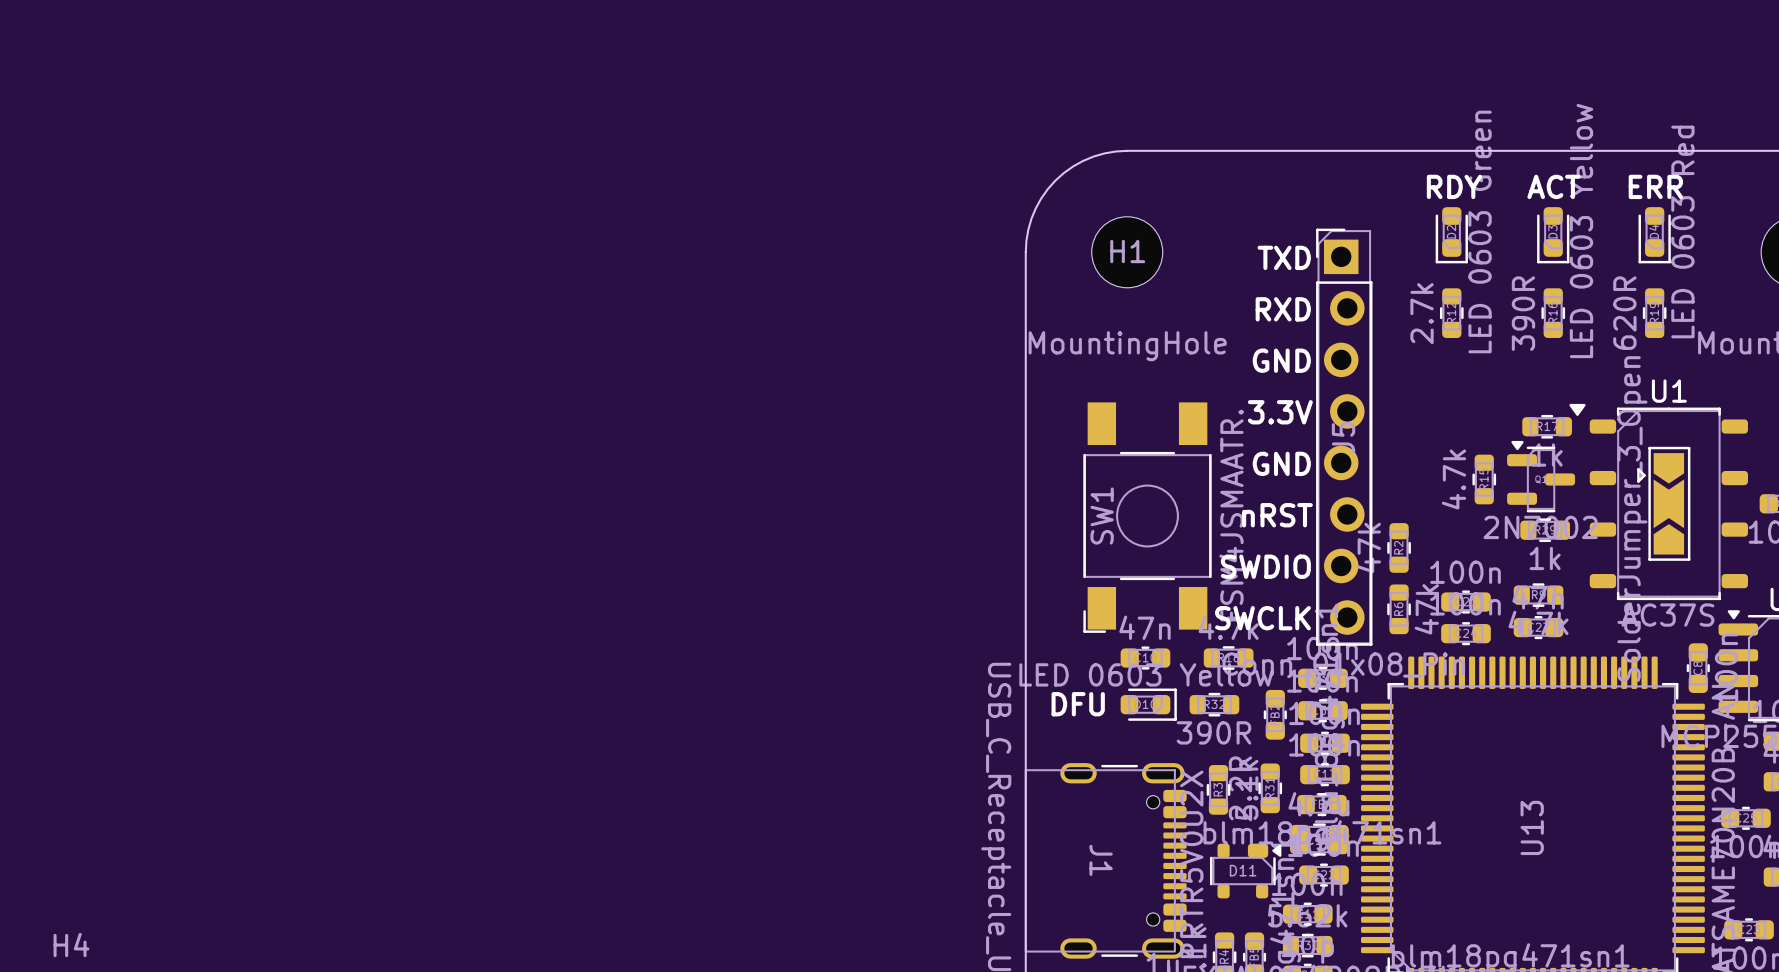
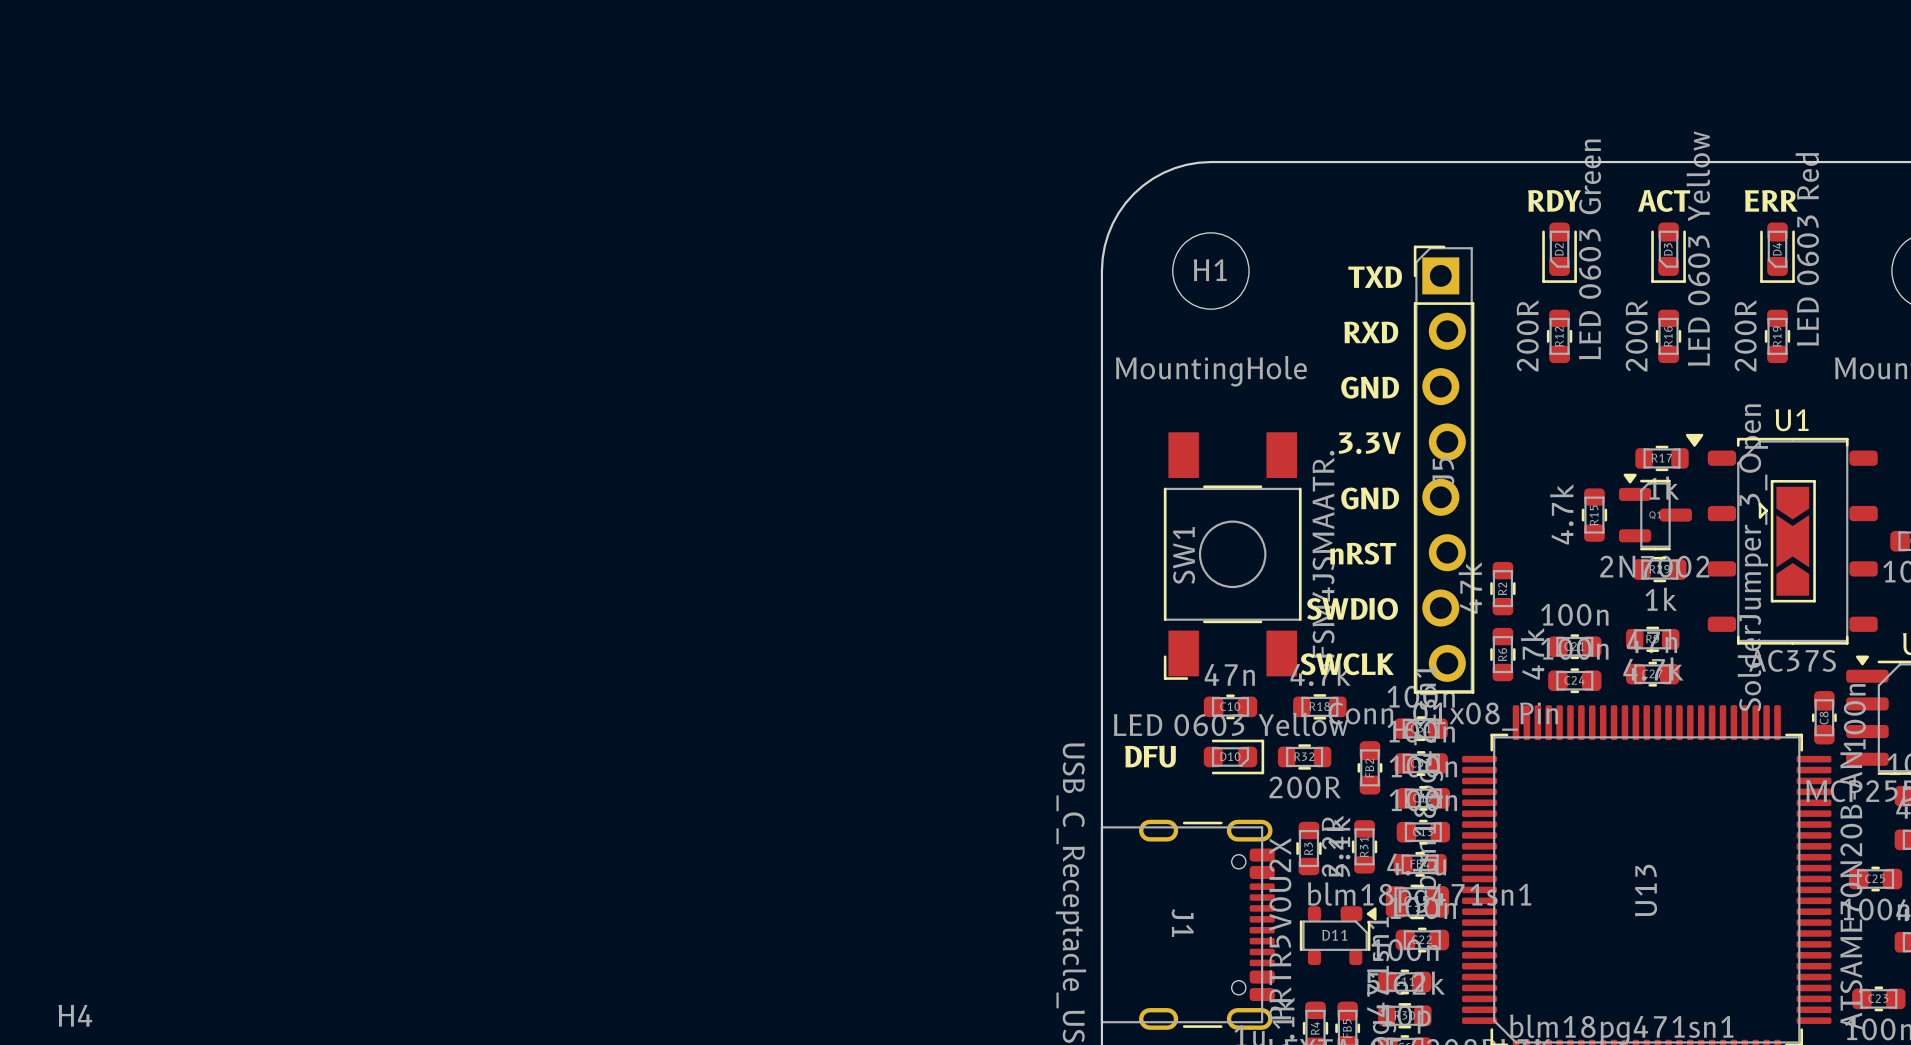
R12 value: 2.7k (1422, 313) -> 200R (1527, 335)
R16 value: 390R (1523, 313) -> 200R (1636, 335)
R19 value: 620R (1624, 313) -> 200R (1745, 335)
R32 value: 390R (1213, 732) -> 200R (1305, 787)

